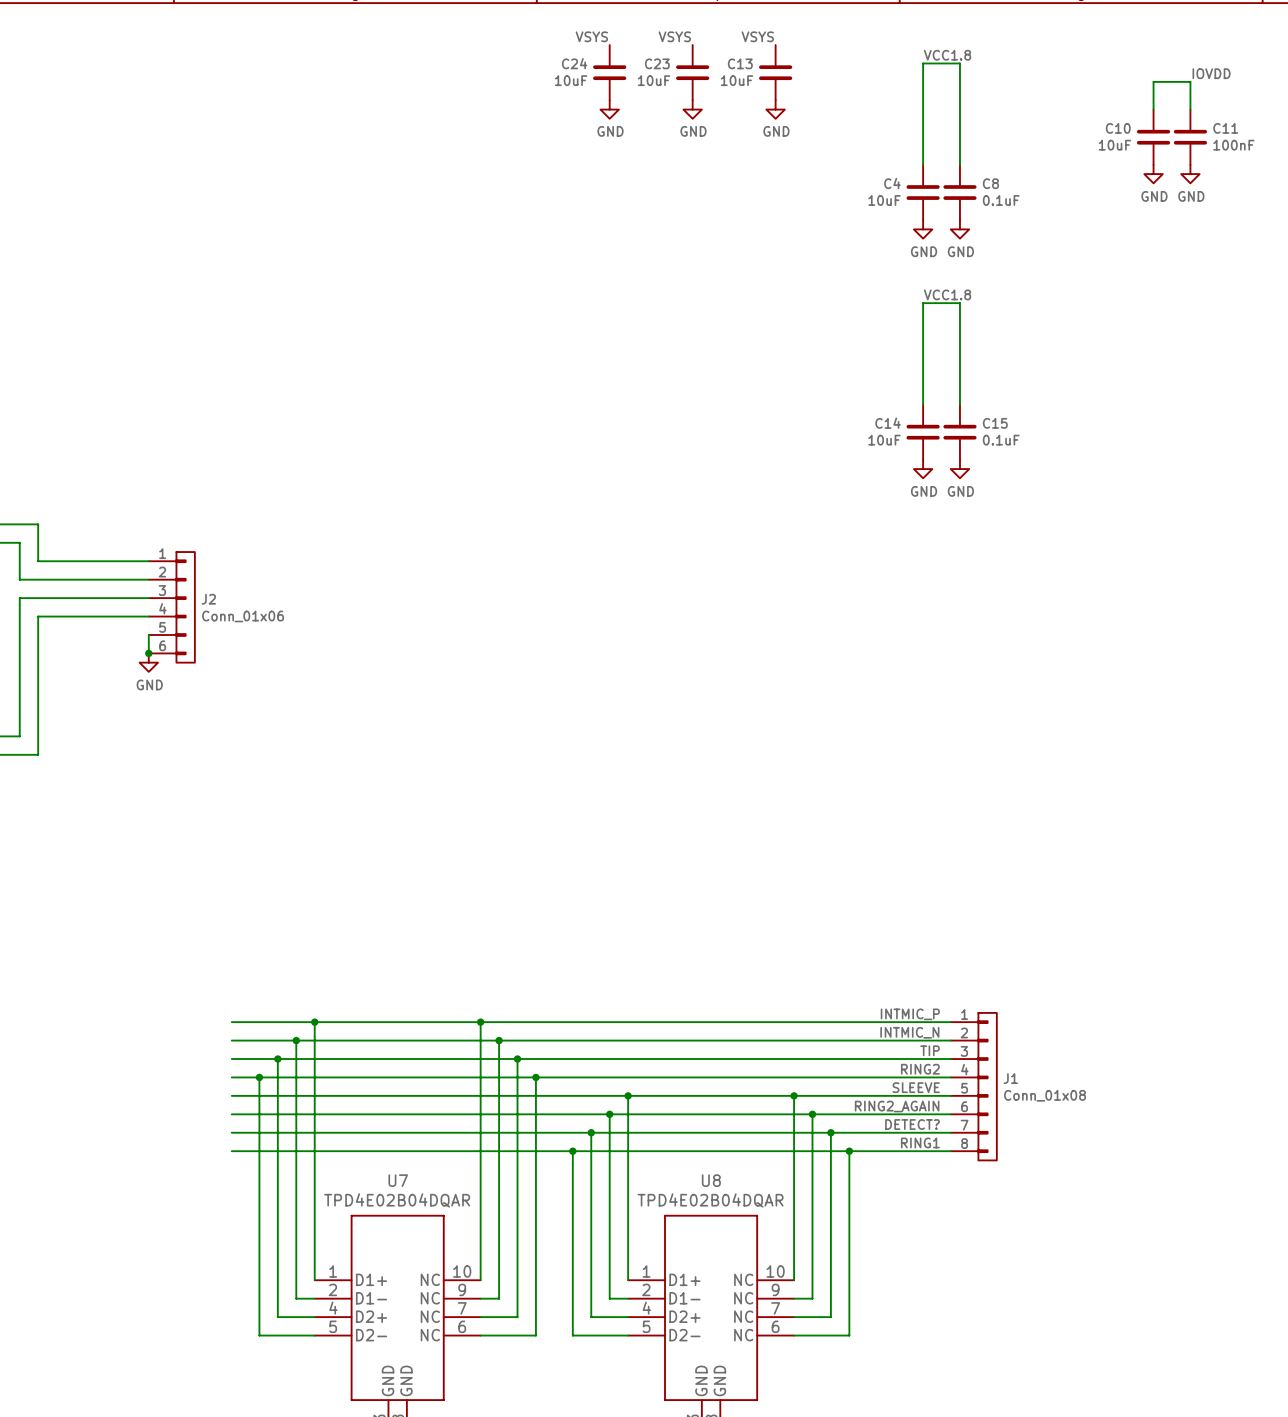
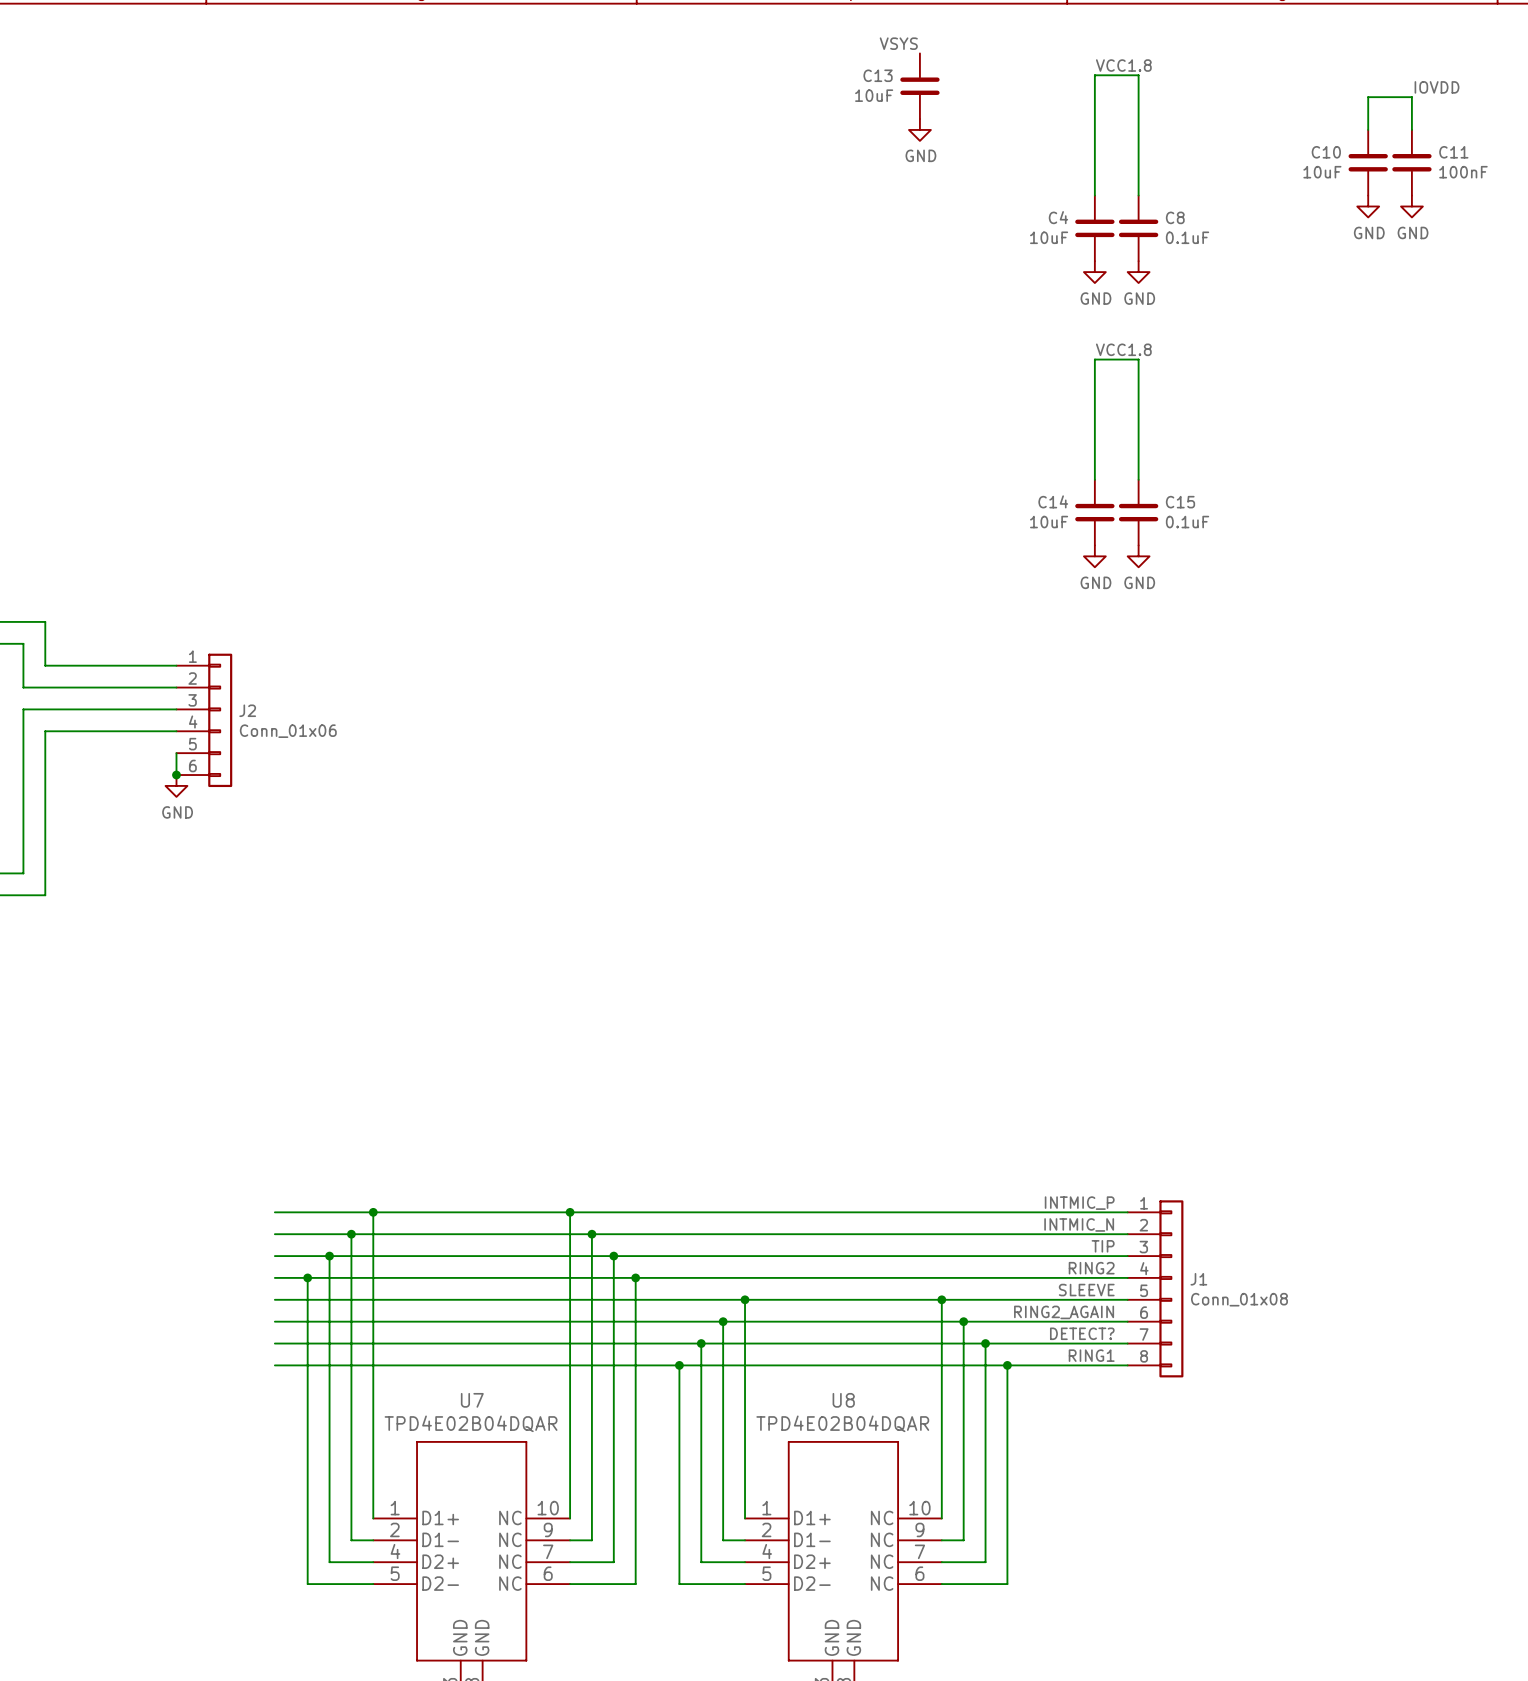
label: VSYS (591, 36) -> none
label: VSYS (674, 36) -> none
C24: 10uF (609, 72) -> none
C23: 10uF (692, 72) -> none
power symbol: GND (609, 109) -> none
power symbol: GND (692, 109) -> none

